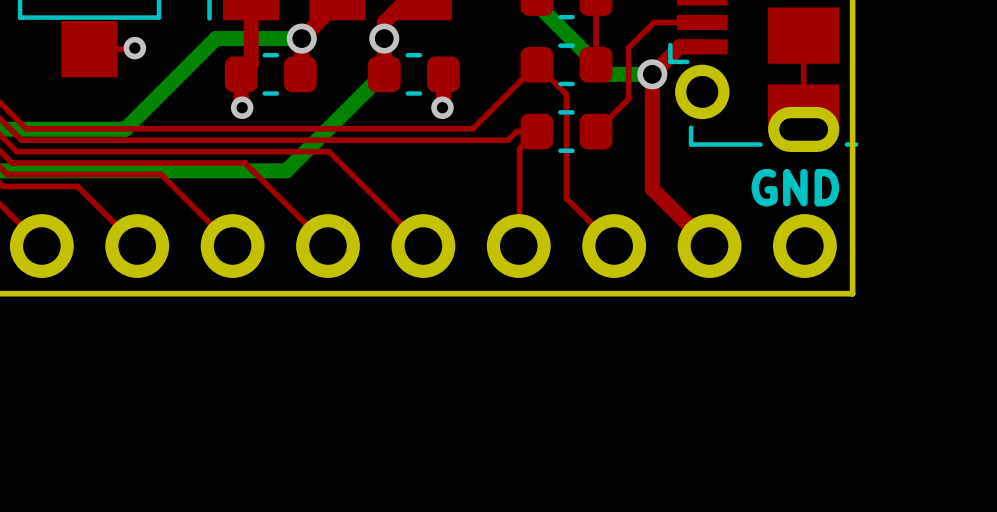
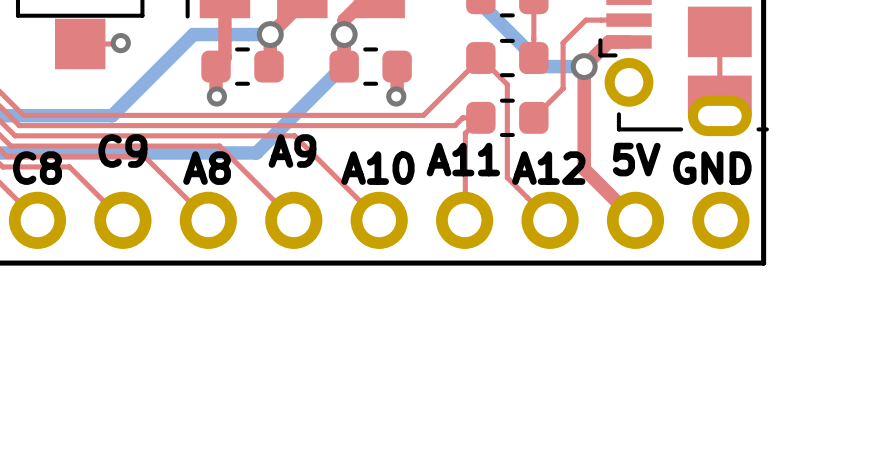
text: none -> C9 (122, 151)
text: none -> A9 (292, 151)
text: none -> A11 (463, 159)
text: none -> 5V (636, 159)
text: none -> C8 (37, 168)
text: none -> A8 (207, 168)
text: none -> A10 (377, 168)
text: none -> A12 (548, 168)

